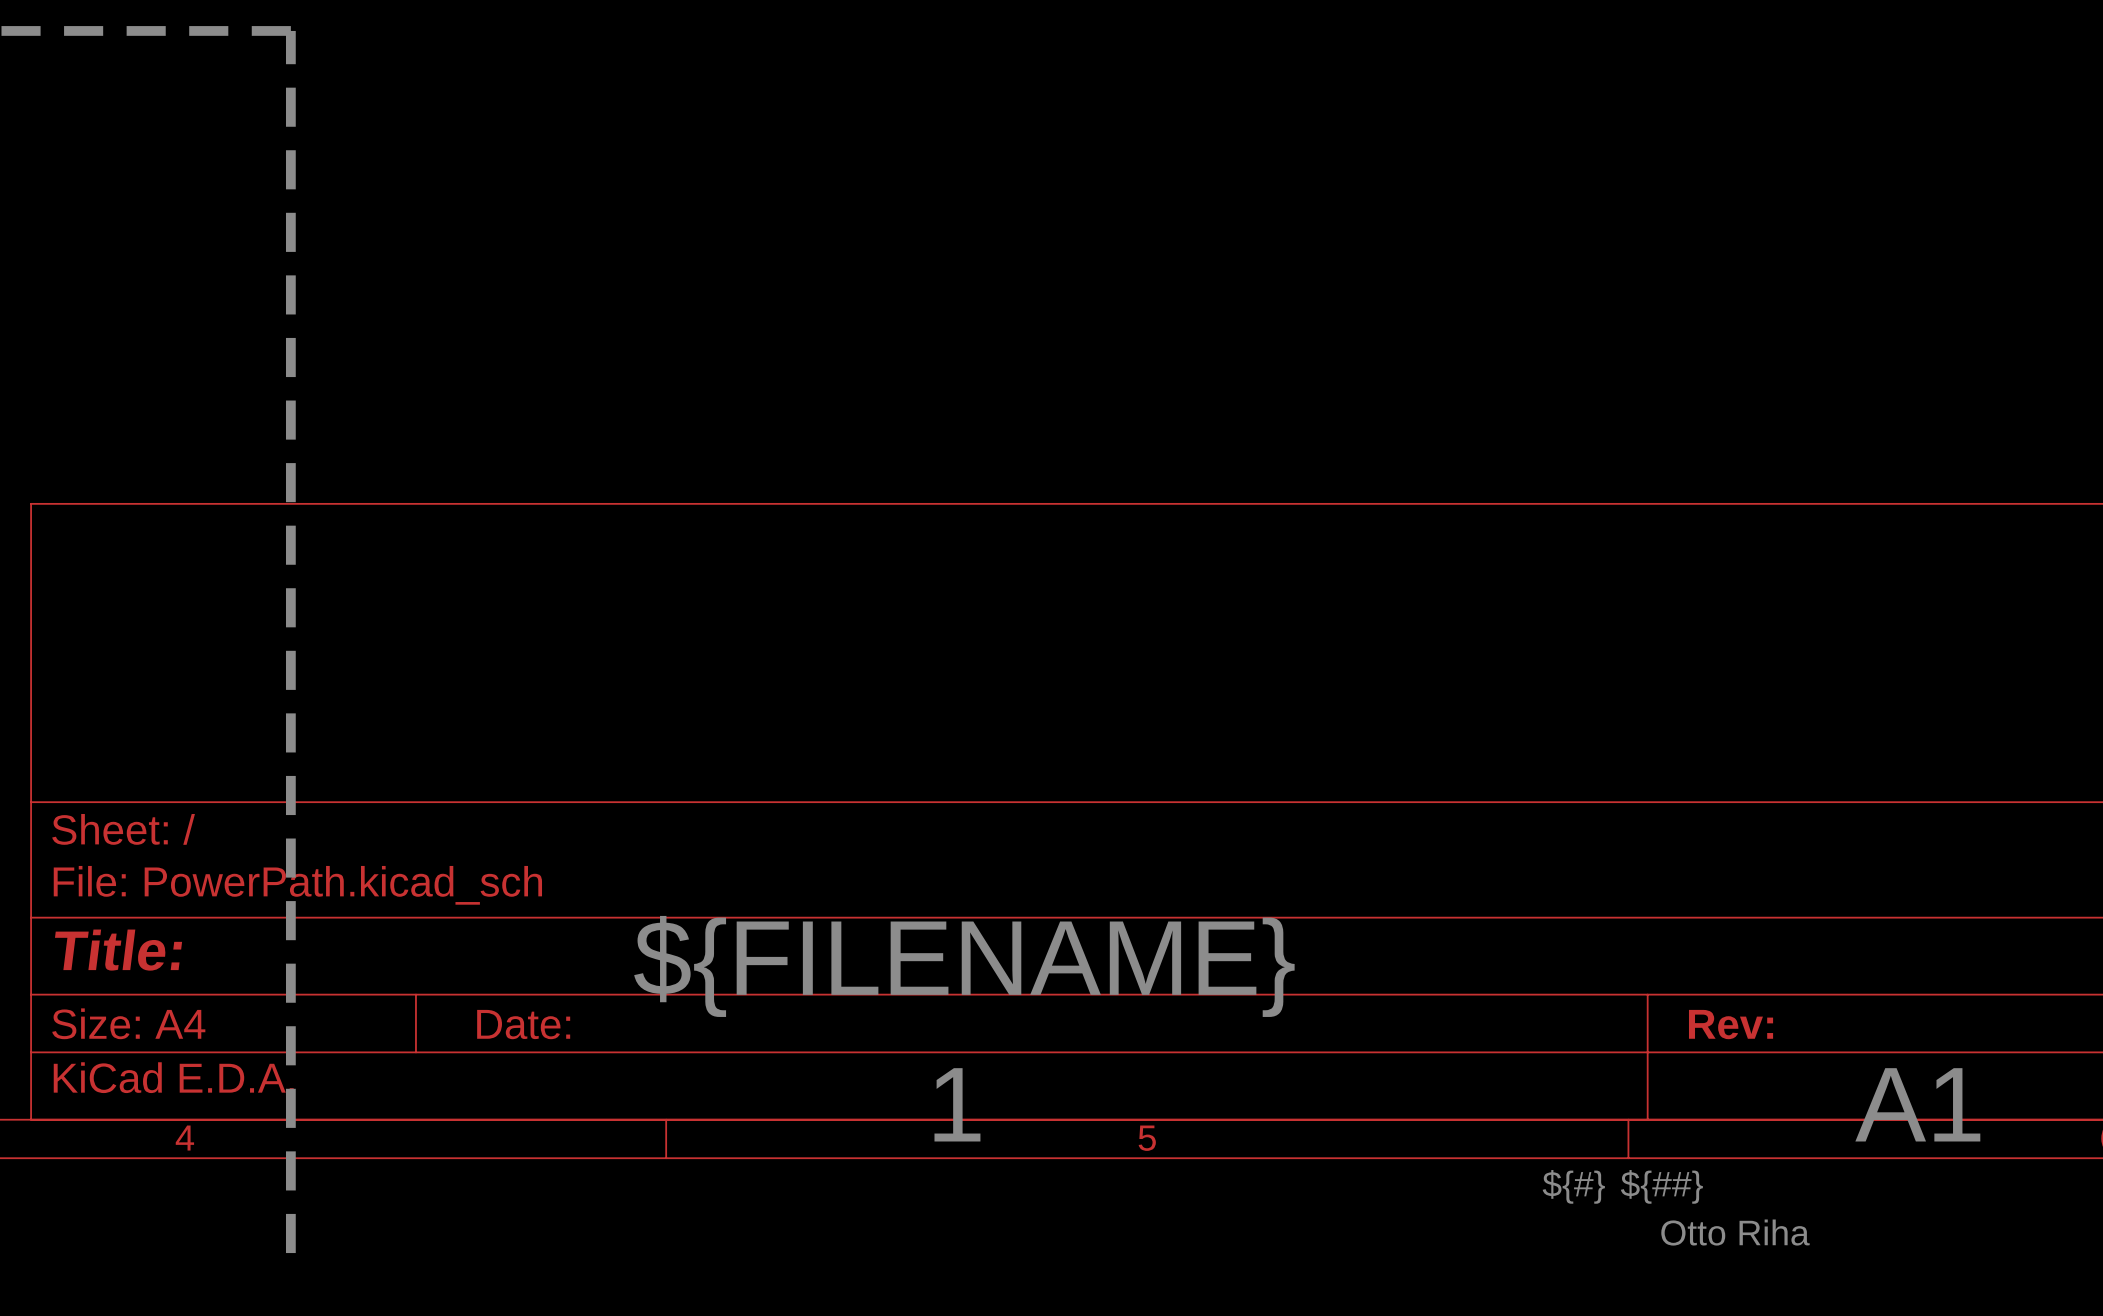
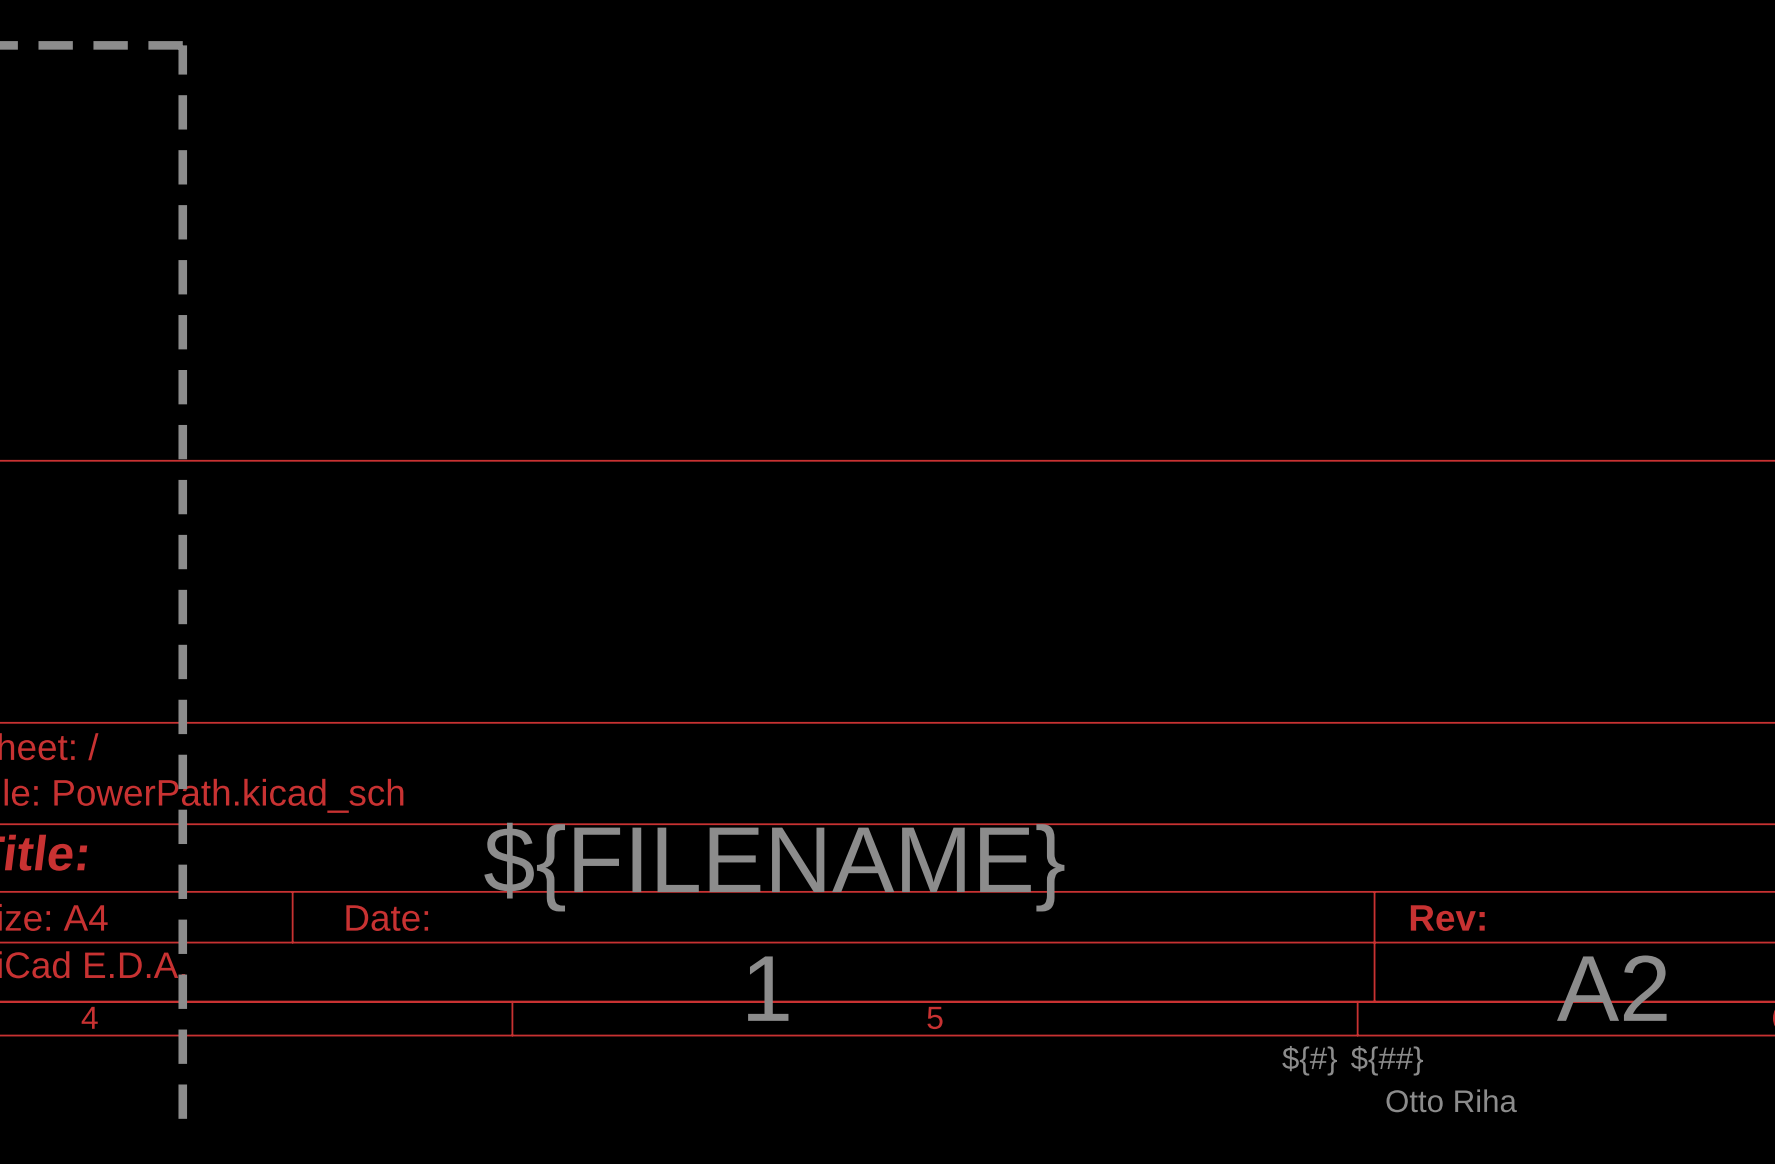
text: A1 (1917, 1104) -> A2 (1611, 988)

